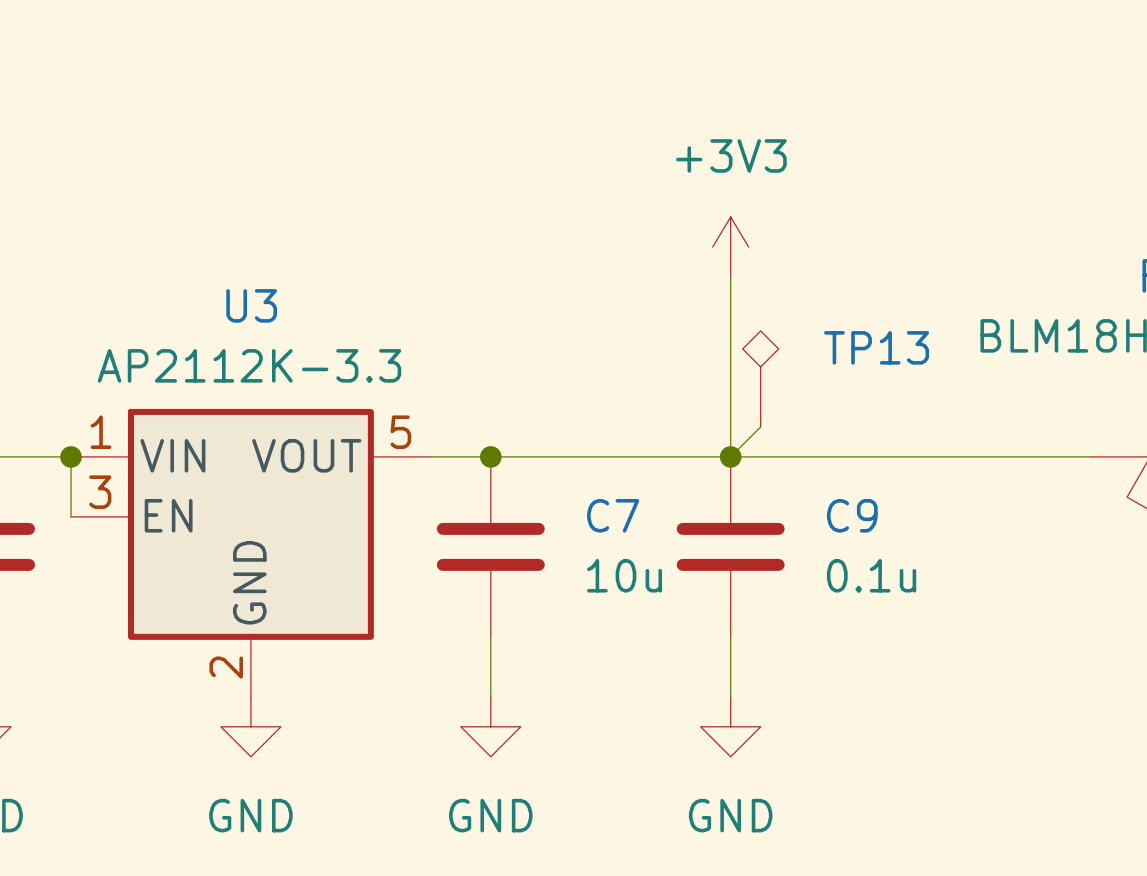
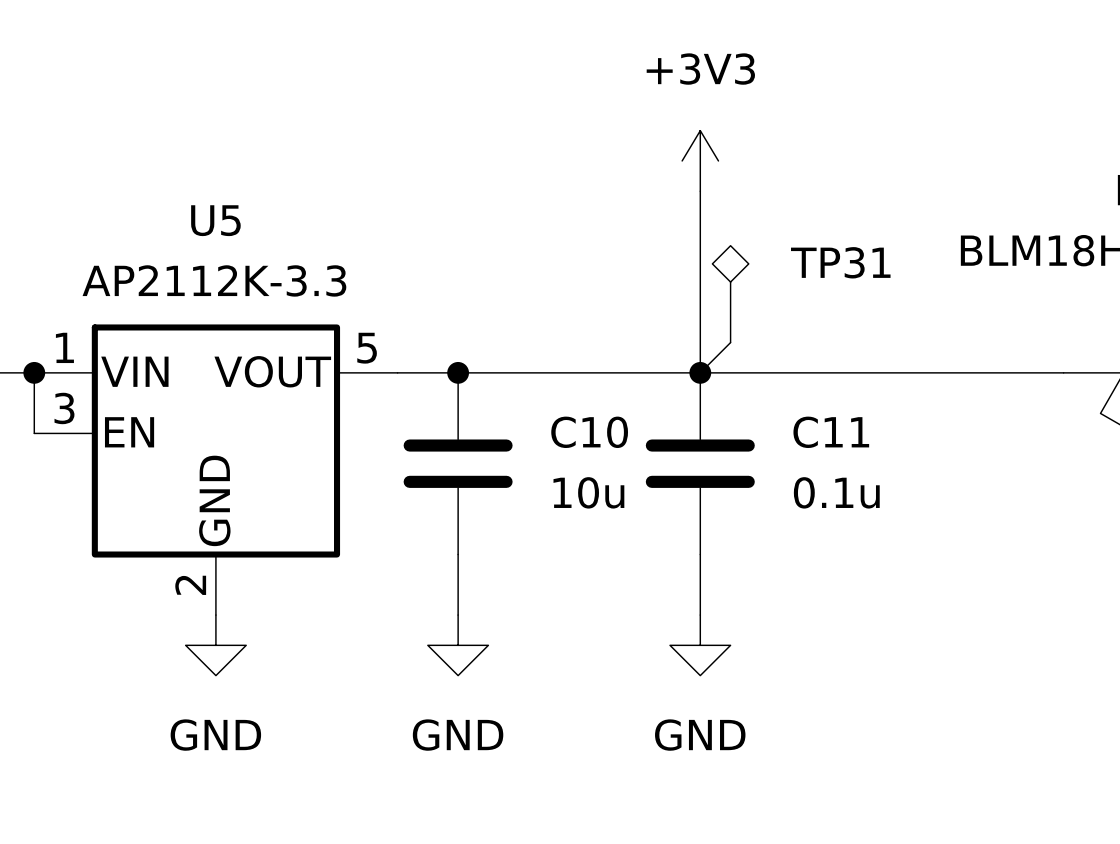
U3 name: U3 (251, 305) -> U5 (215, 220)
TP13 name: TP13 (876, 347) -> TP31 (840, 262)
C7 name: C7 (613, 515) -> C10 (589, 432)
C9 name: C9 (852, 515) -> C11 (831, 432)

